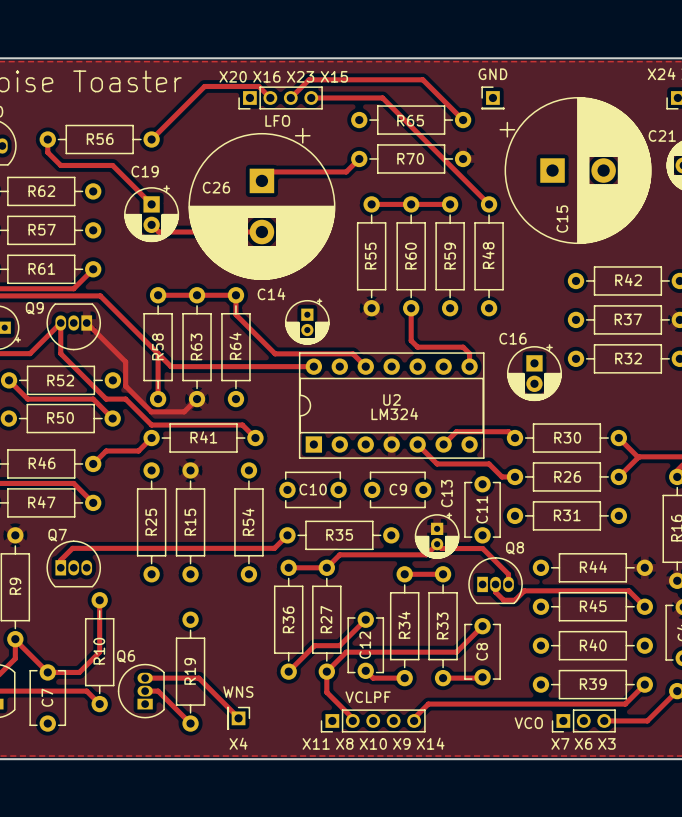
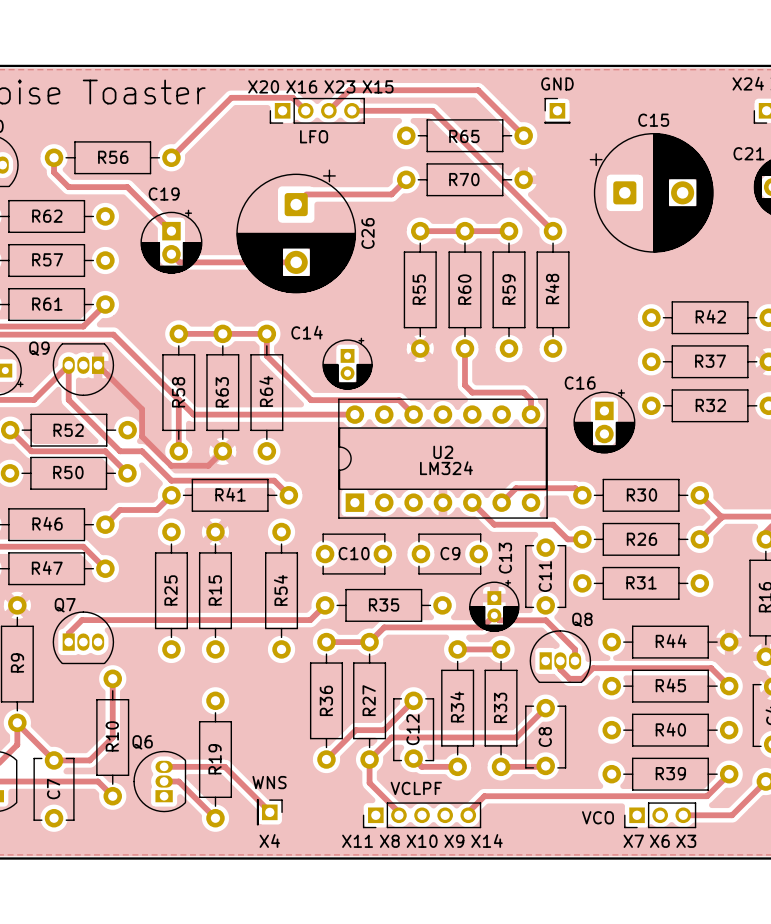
C15 footprint: [499, 97, 652, 244] -> [589, 132, 714, 253]
C26 footprint: [188, 127, 336, 280] -> [236, 169, 357, 294]
C26 name position: C26 (216, 187) -> C26 (368, 233)
C15 name position: C15 (562, 219) -> C15 (653, 120)

